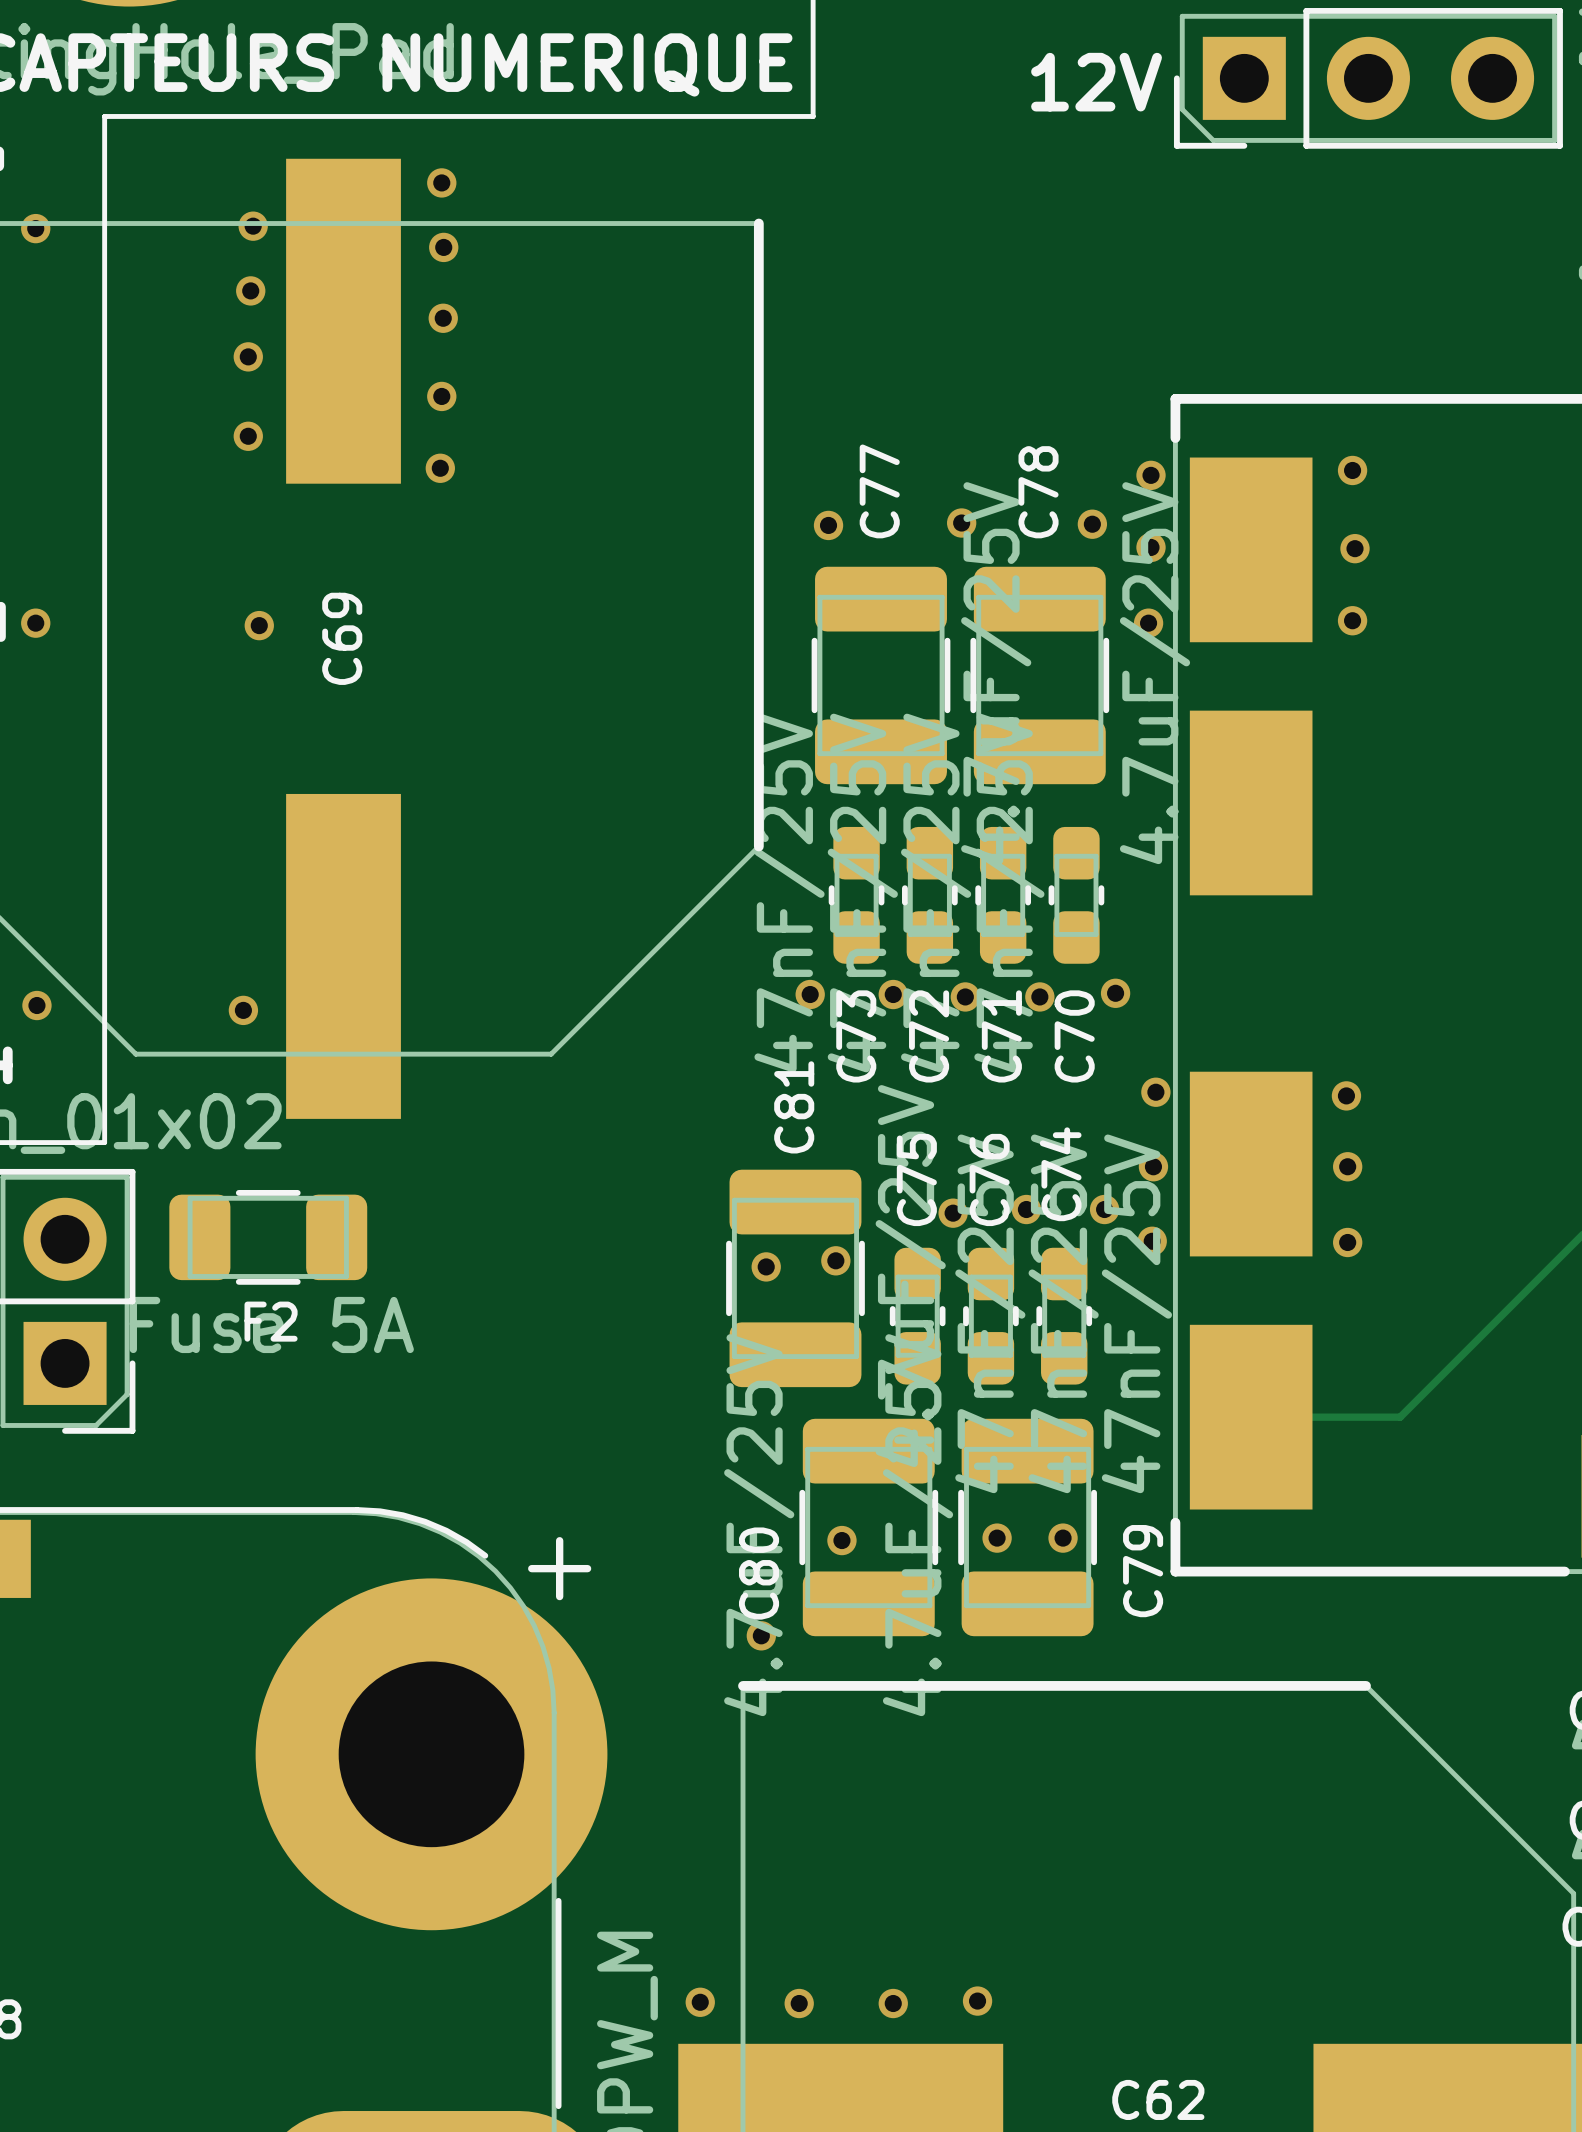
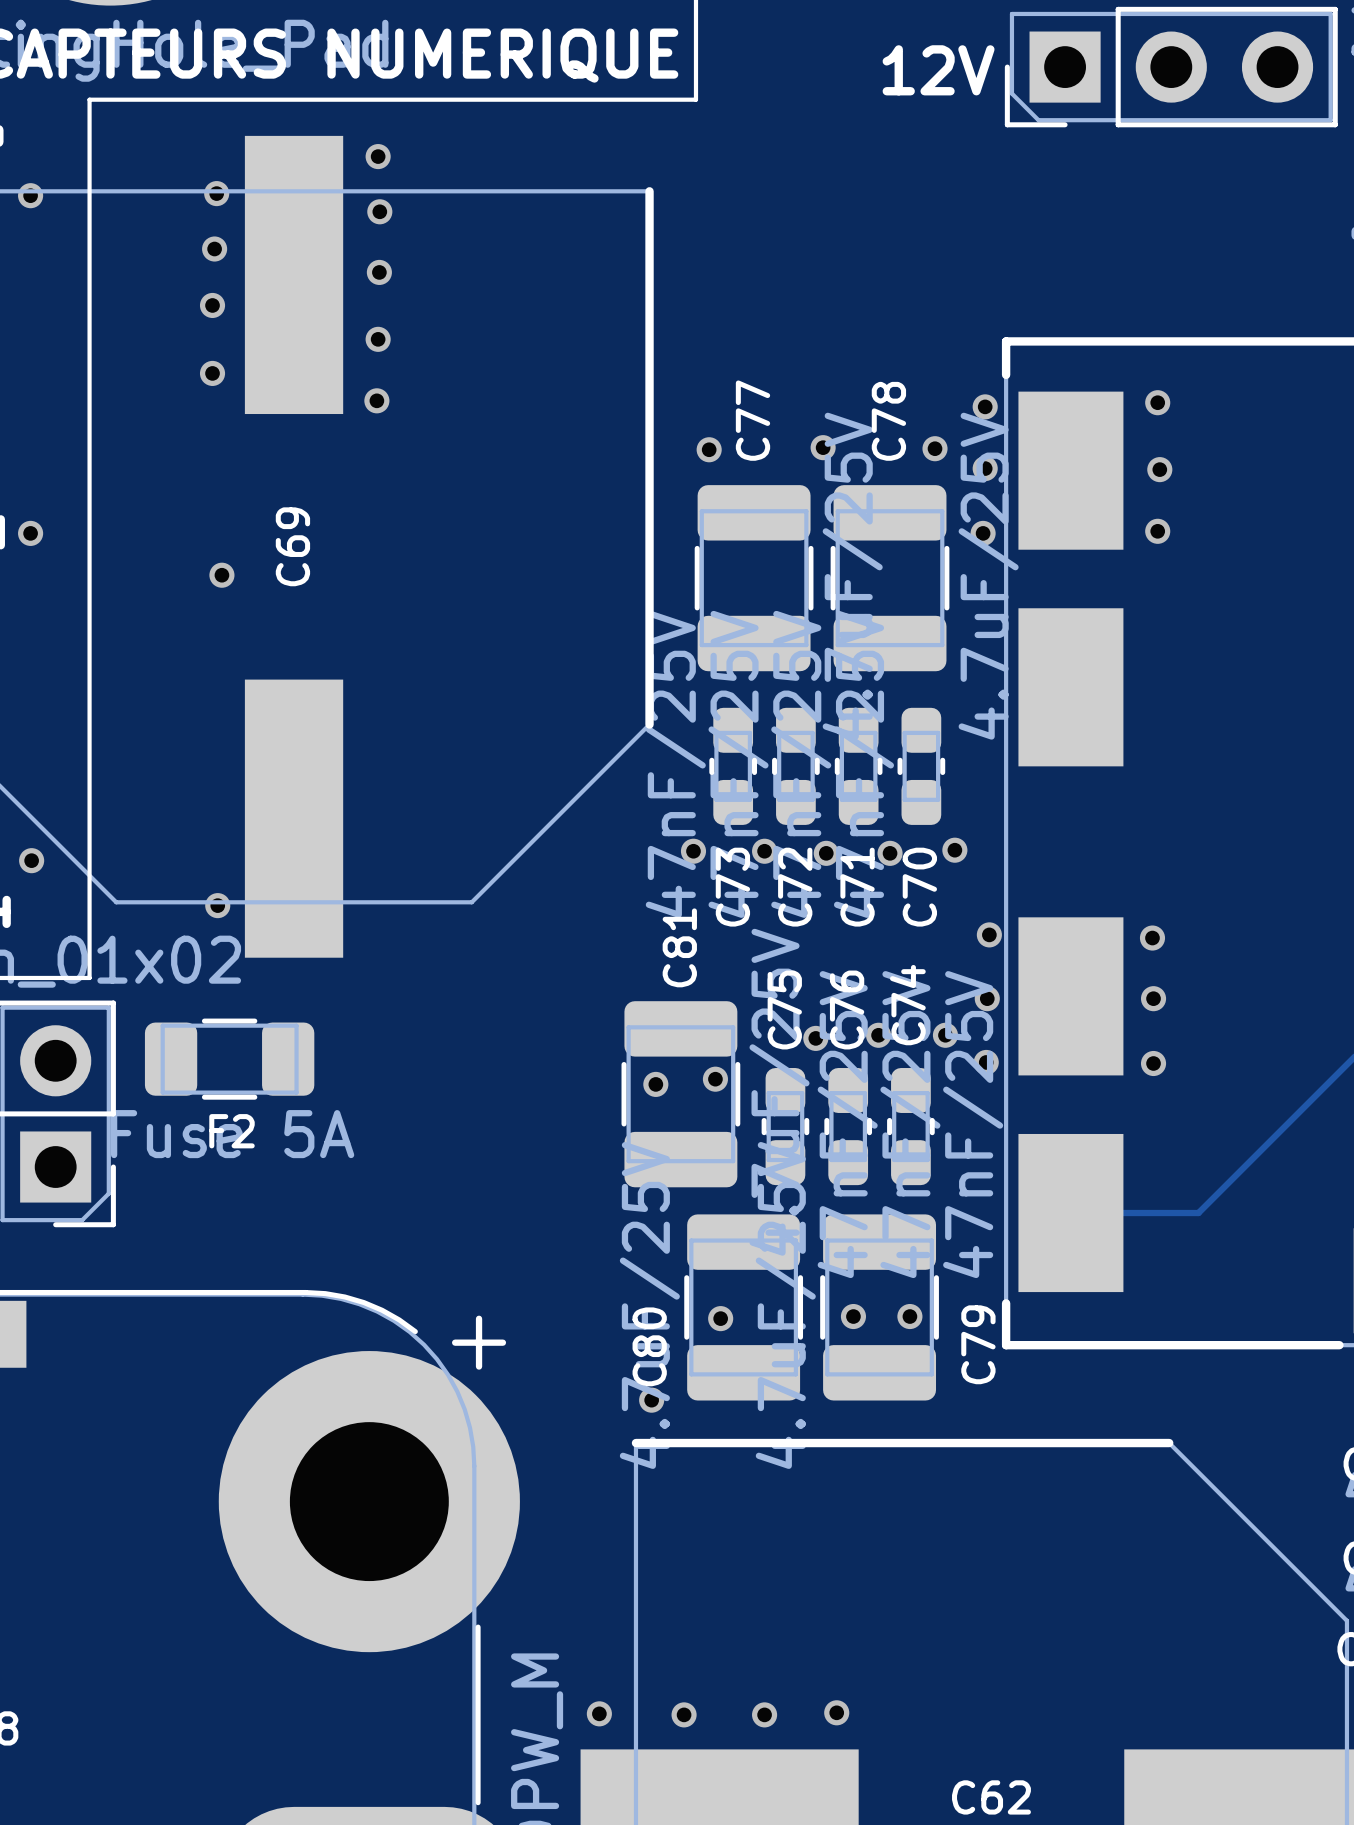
via position: (259, 625) -> (221, 575)
via position: (243, 1010) -> (217, 905)

